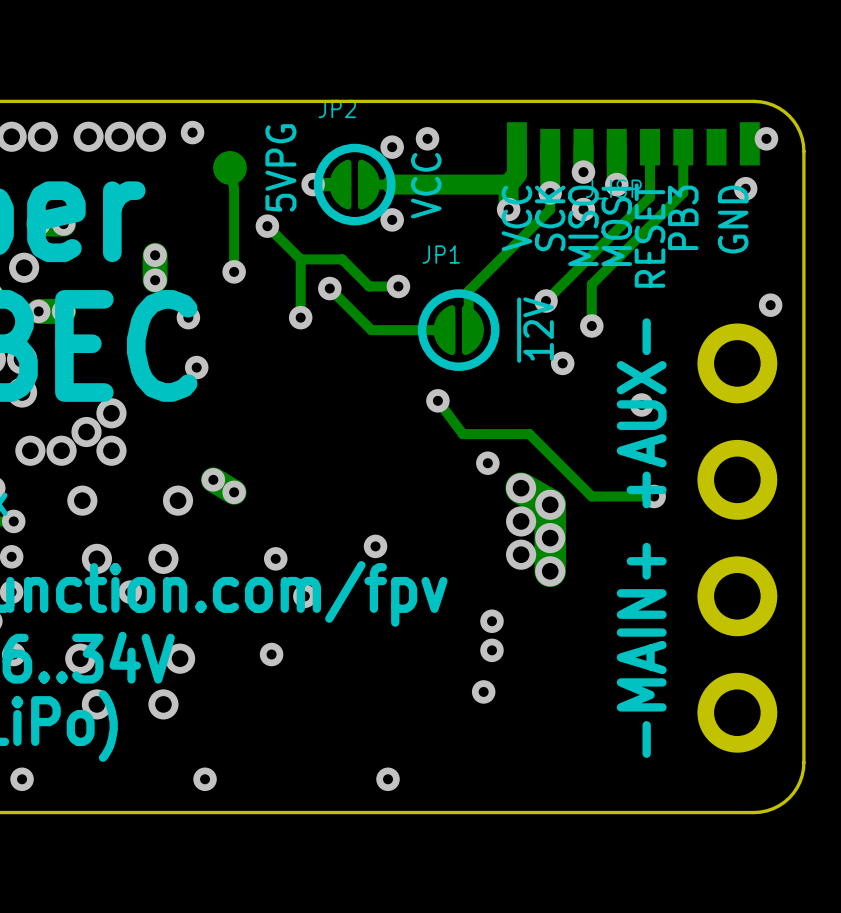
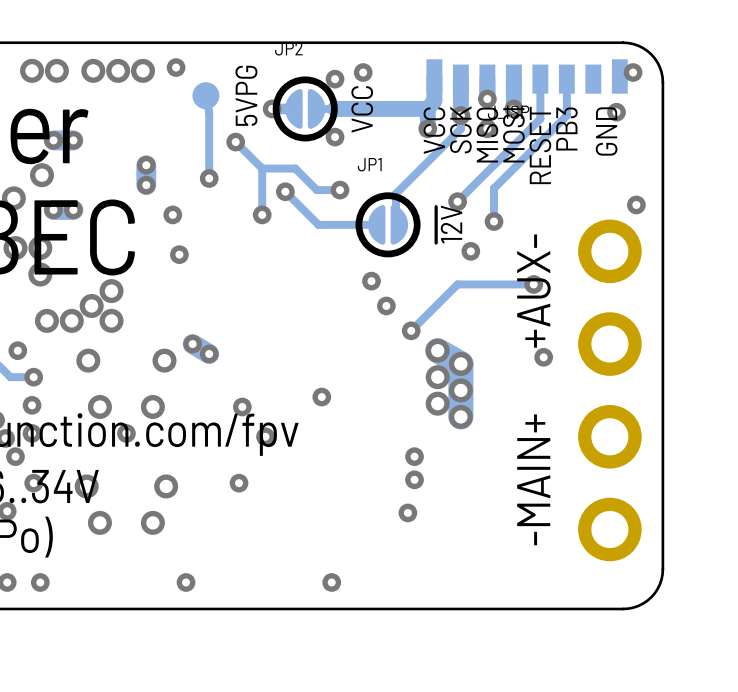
track: (437, 400) (462, 434) (529, 434) (591, 496) (654, 496) -> none
track: none -> (533, 284) (457, 284) (411, 330)
via: none -> (386, 305)

